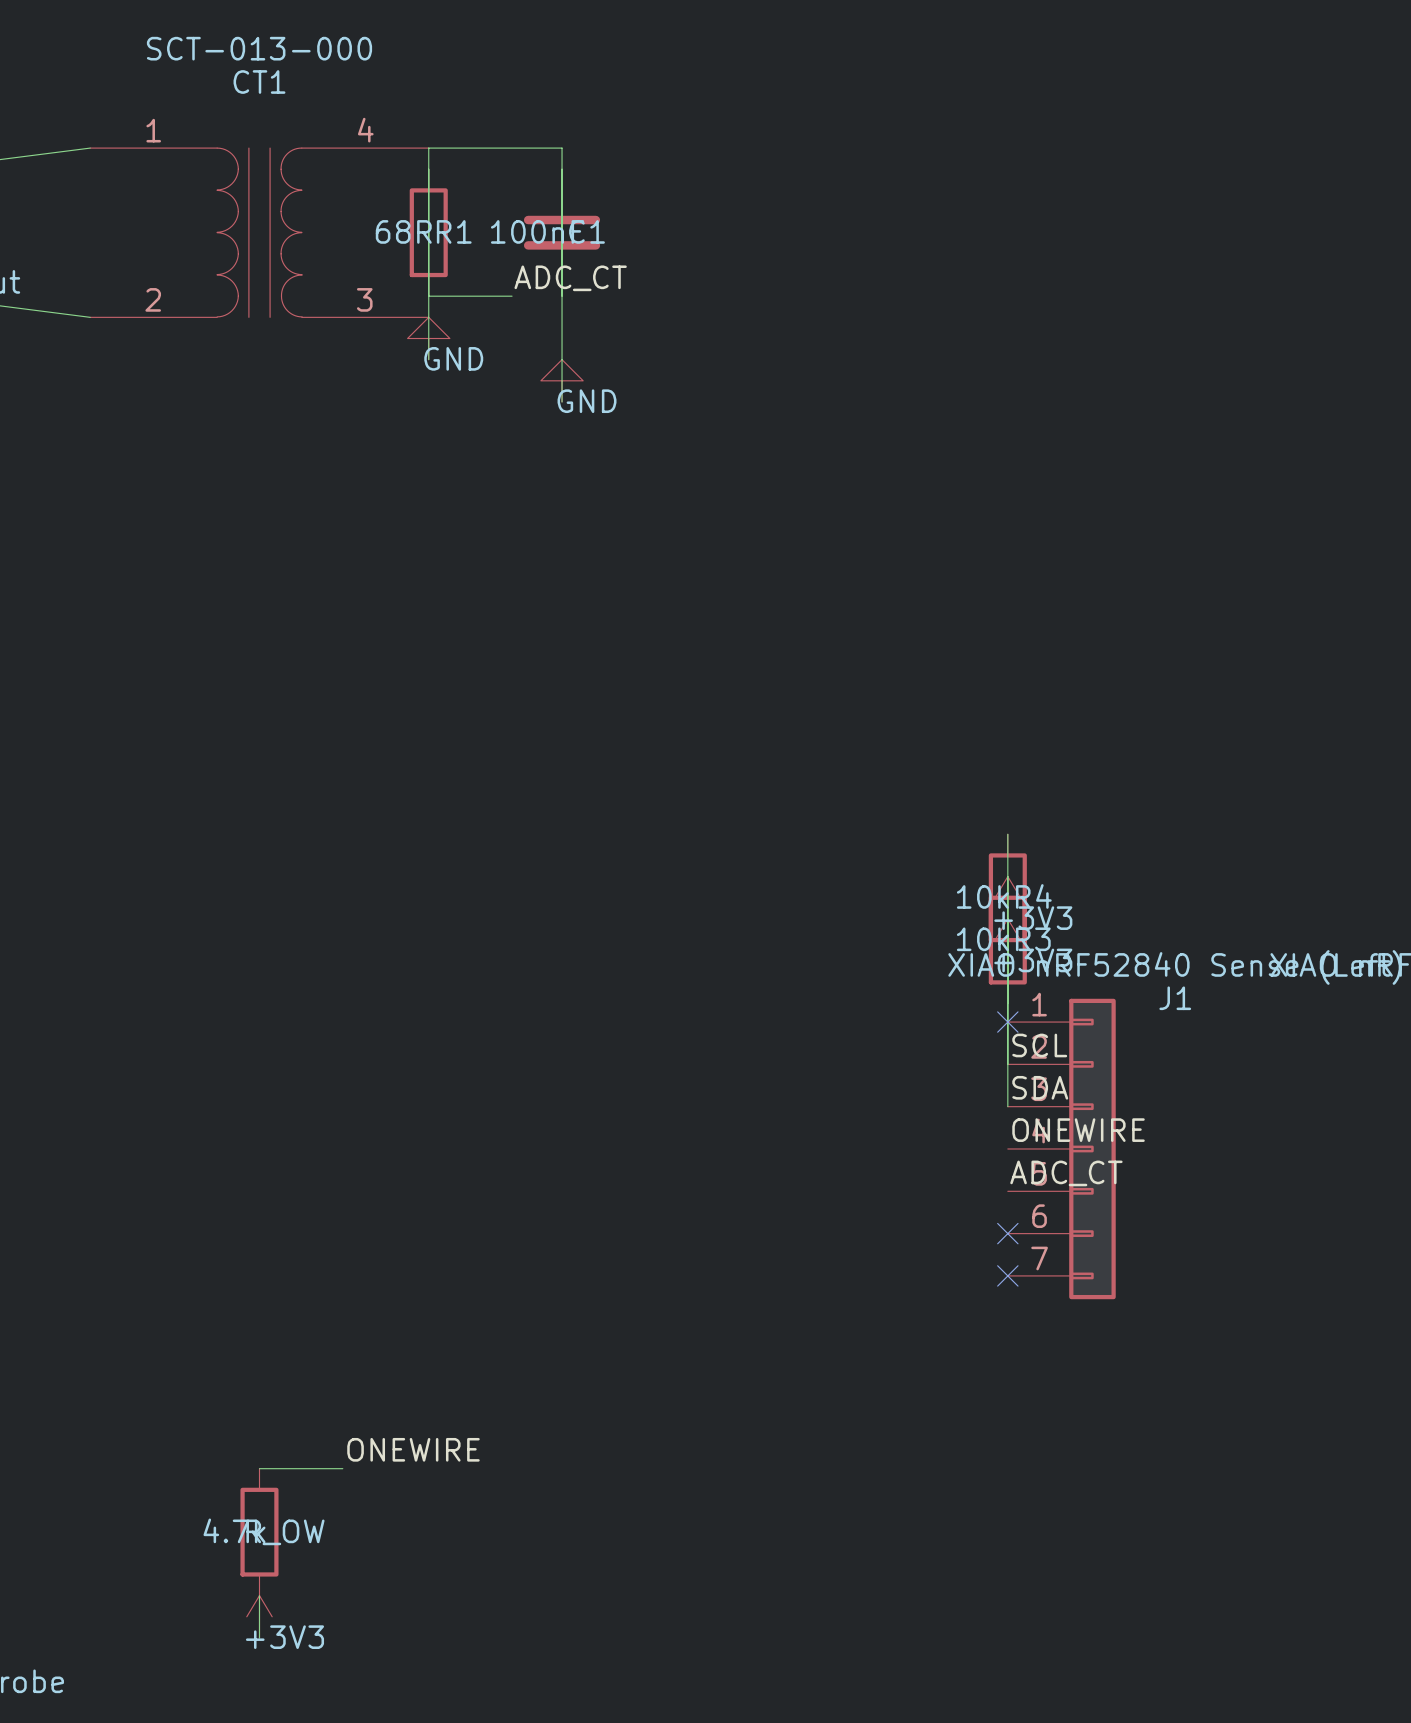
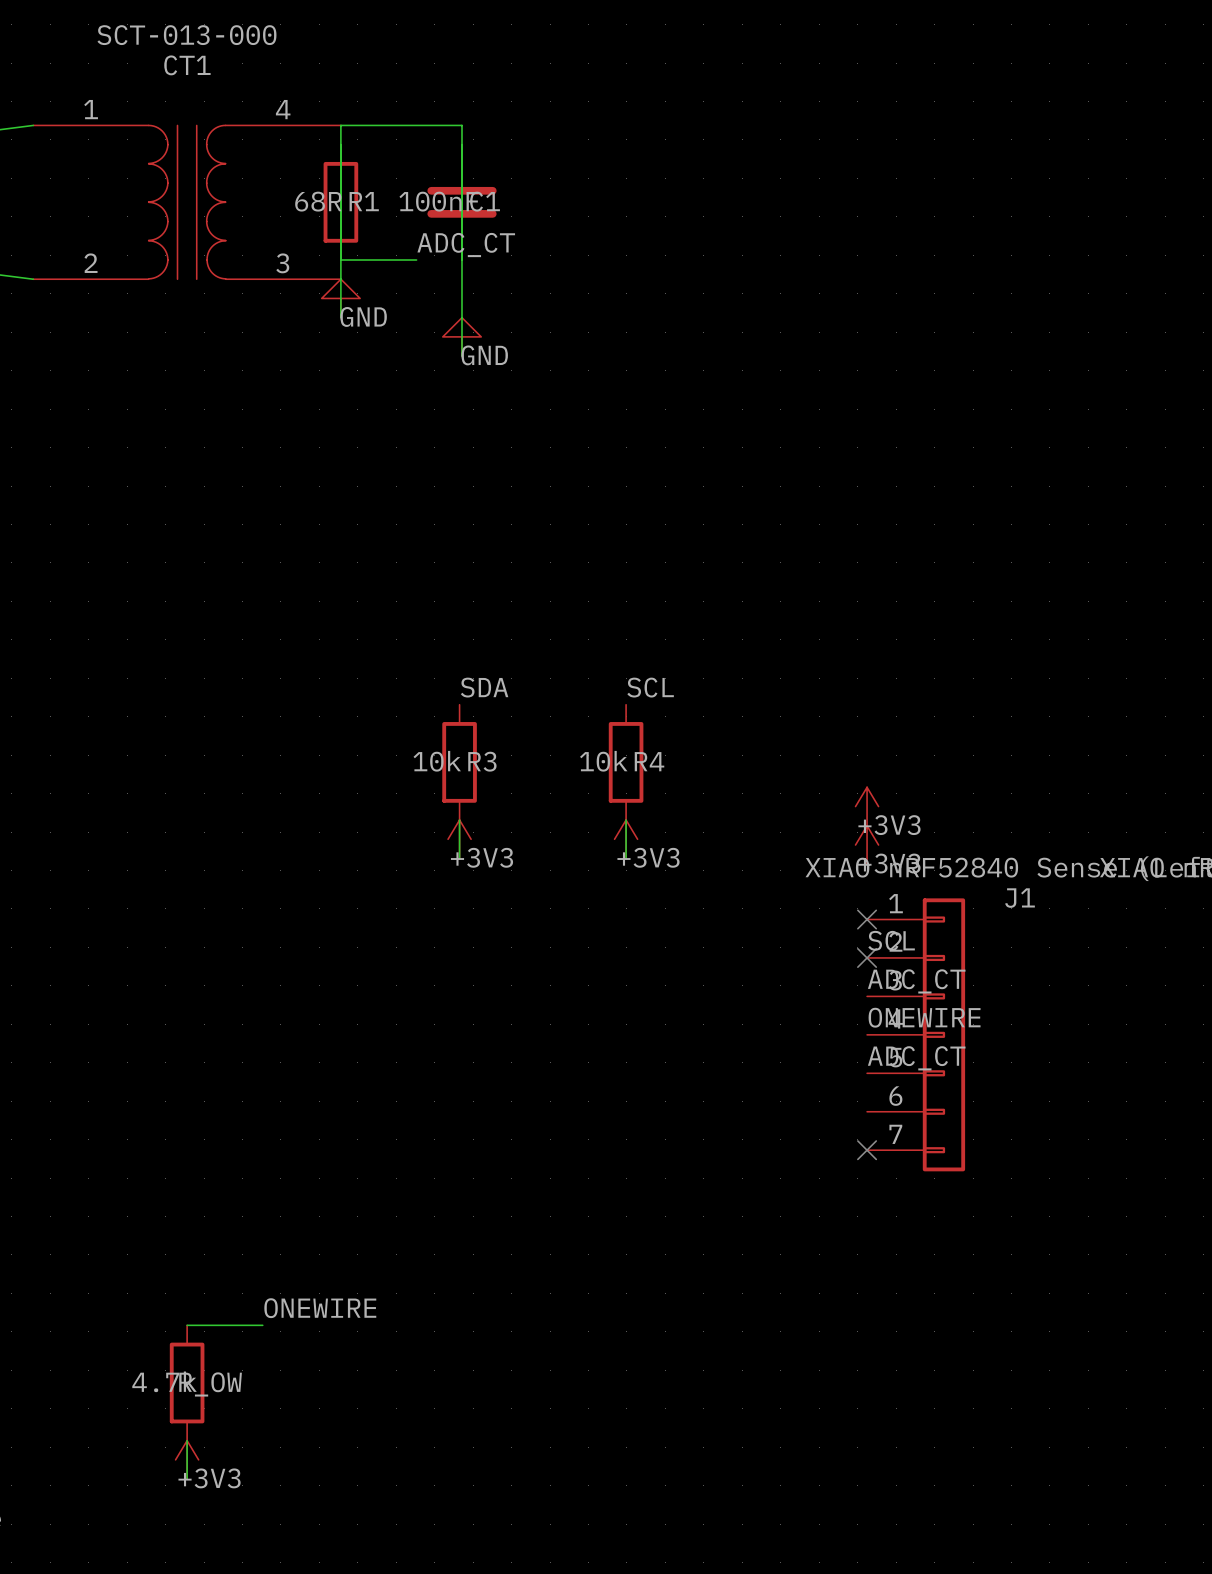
label: none -> SDA (484, 687)
label: none -> SCL (650, 687)
wire: (1007, 834) (1007, 1106) -> none
R4 position: (1007, 897) -> (626, 762)
wire: none -> (459, 820) (459, 858)
wire: none -> (626, 820) (626, 858)
power symbol: none -> +3V3 (459, 839)
power symbol: none -> +3V3 (626, 839)
R3 position: (1007, 940) -> (459, 762)
no-connect mark: none -> (867, 957)
label: SDA (1040, 1087) -> ADC_CT (916, 981)
no-connect mark: (1007, 1233) -> none

